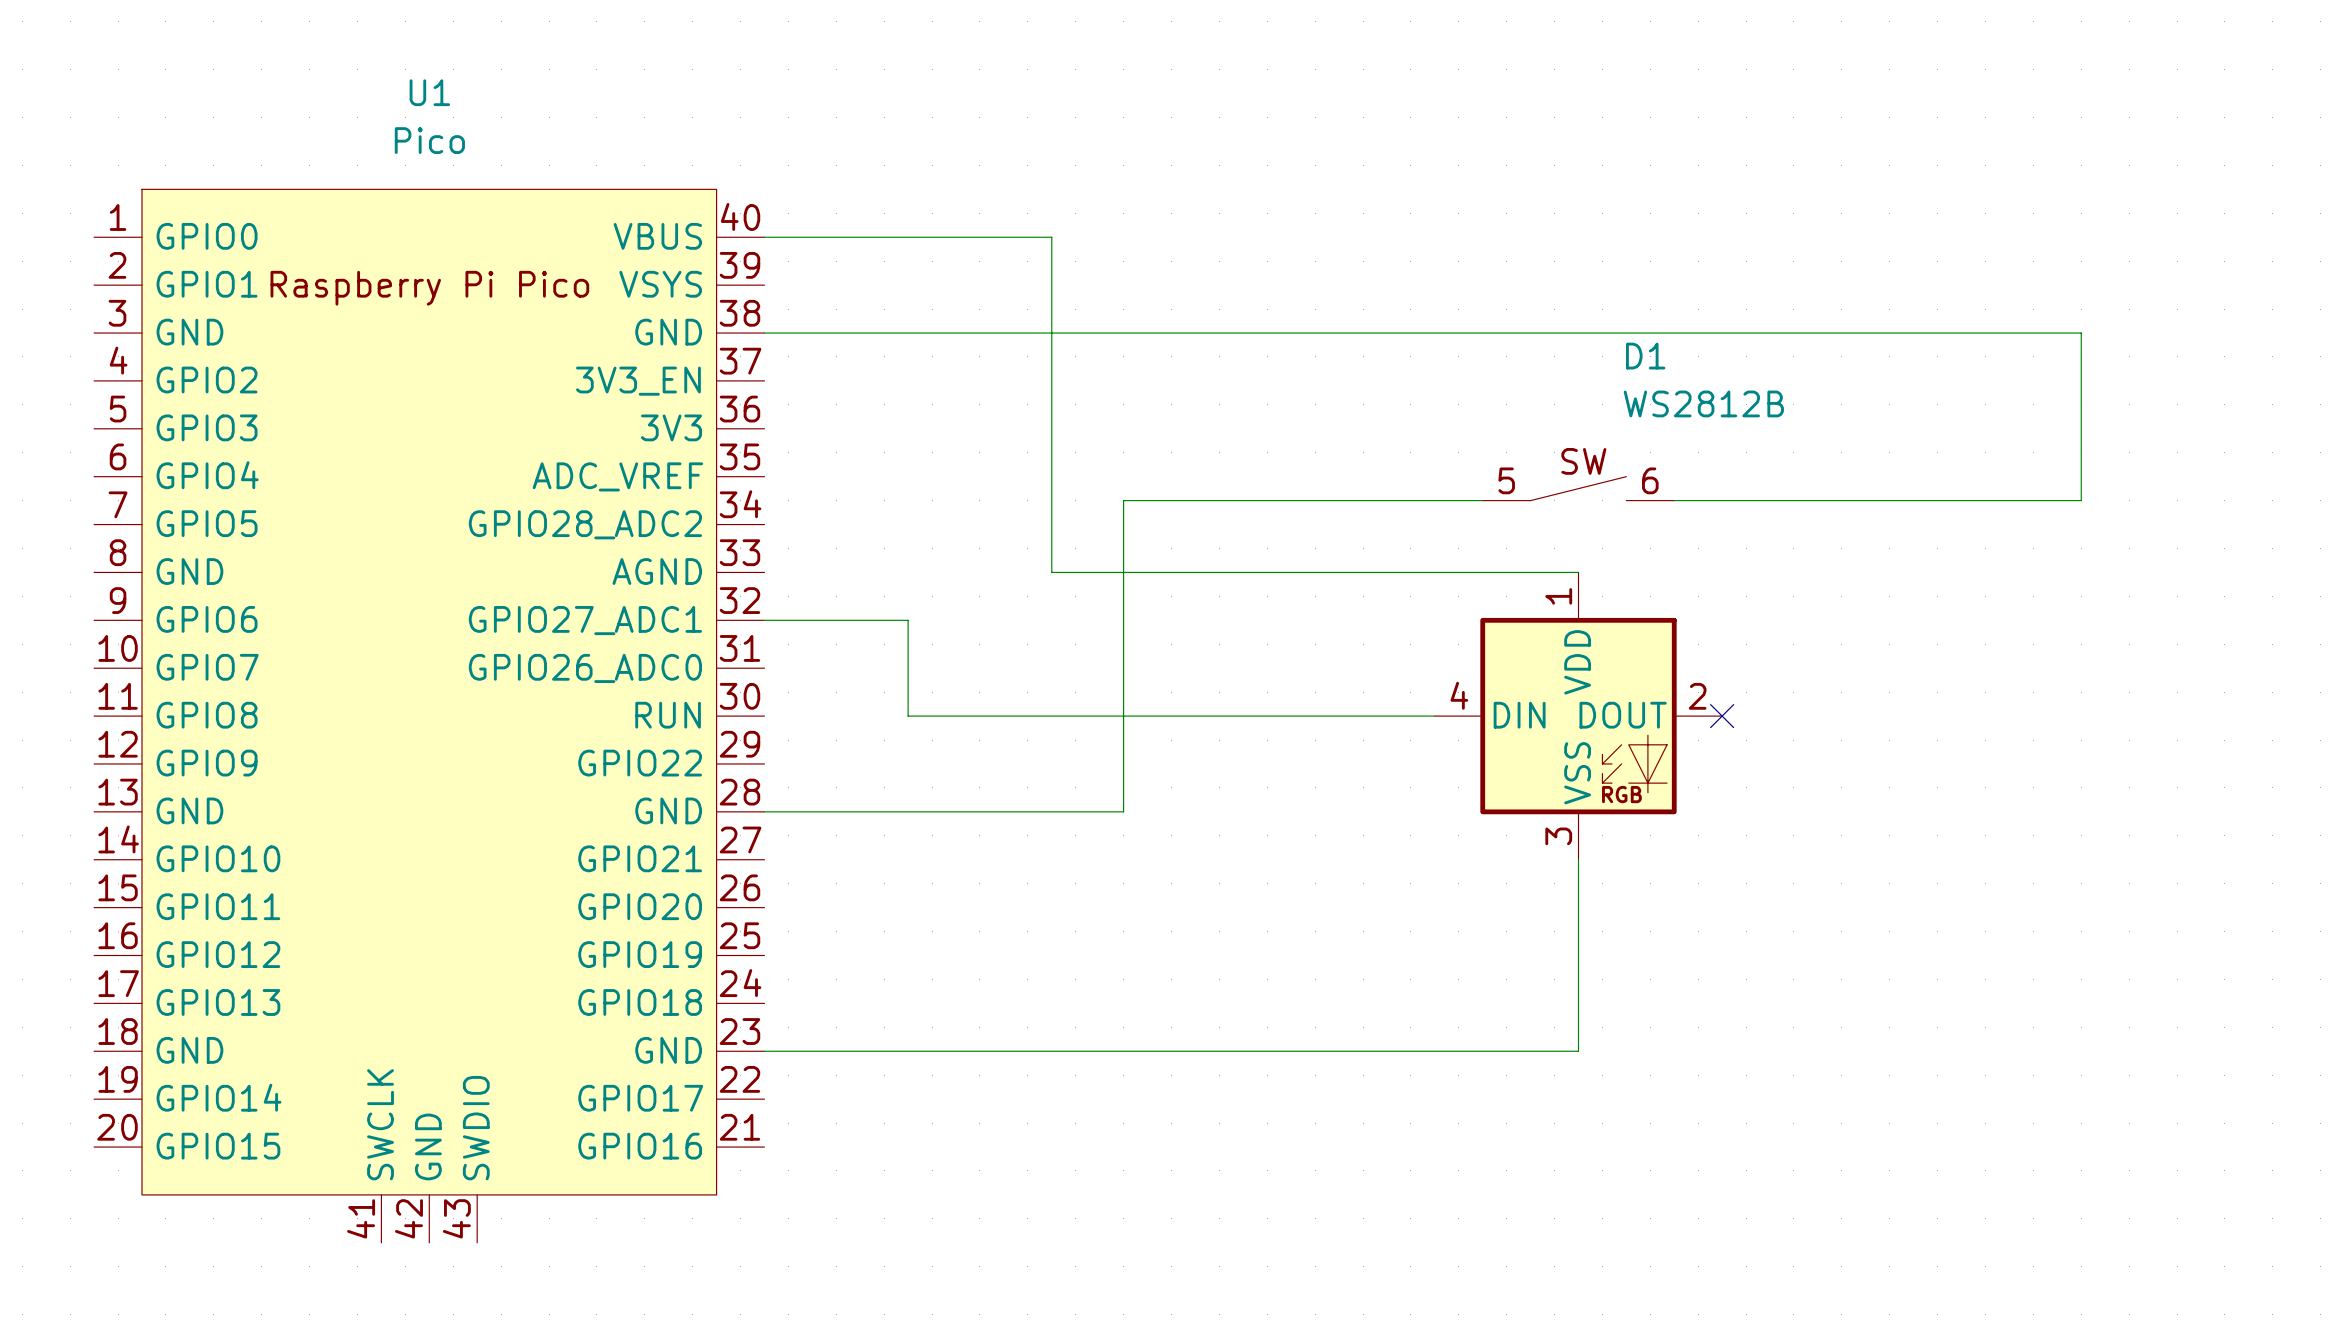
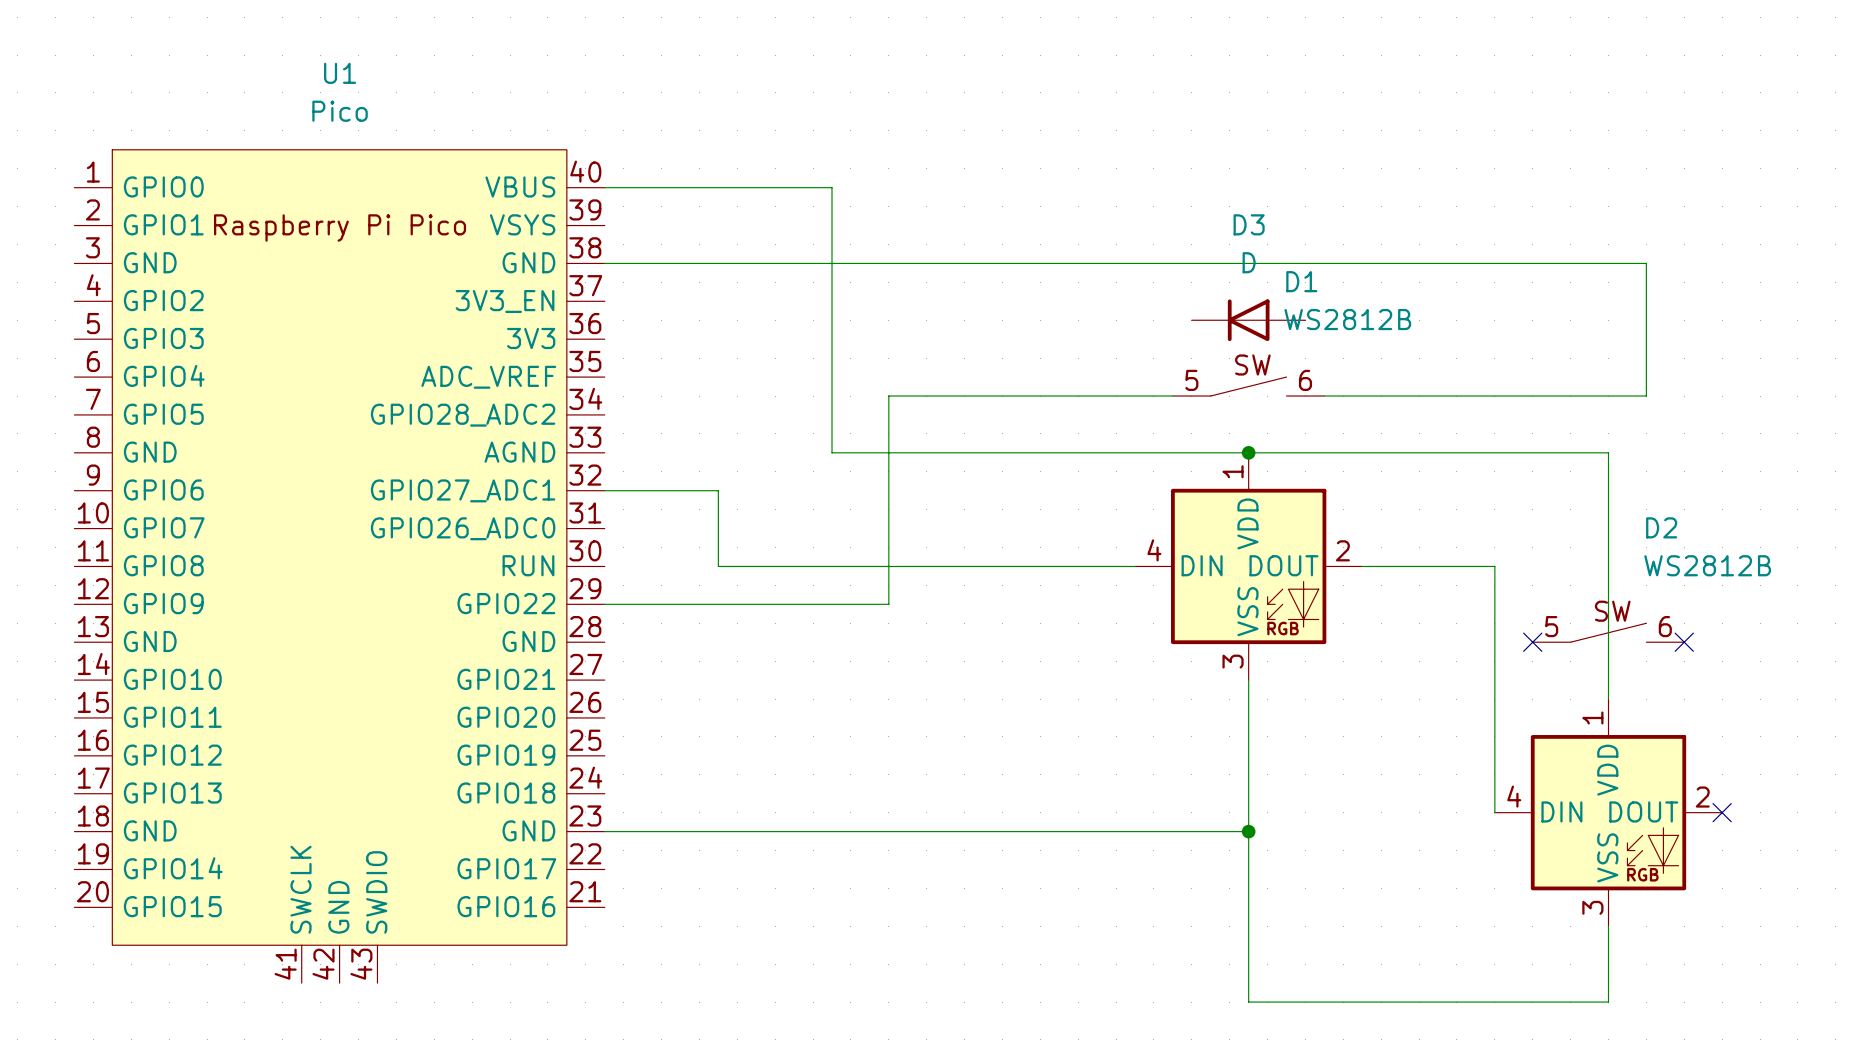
D3: none -> D (1248, 320)
wire: none -> (1248, 452) (1608, 452) (1608, 699)
junction: none -> (1248, 452)
wire: none -> (1362, 566) (1494, 566) (1494, 812)
no-connect mark: (1722, 716) -> none
wire: (1123, 763) (1123, 811) (764, 811) -> (888, 604) (604, 604)
no-connect mark: none -> (1532, 642)
no-connect mark: none -> (1684, 642)
D2: none -> WS2812B (1608, 774)
no-connect mark: none -> (1722, 812)
wire: none -> (1248, 831) (1248, 1002) (1608, 1002) (1608, 926)
junction: none -> (1248, 831)

